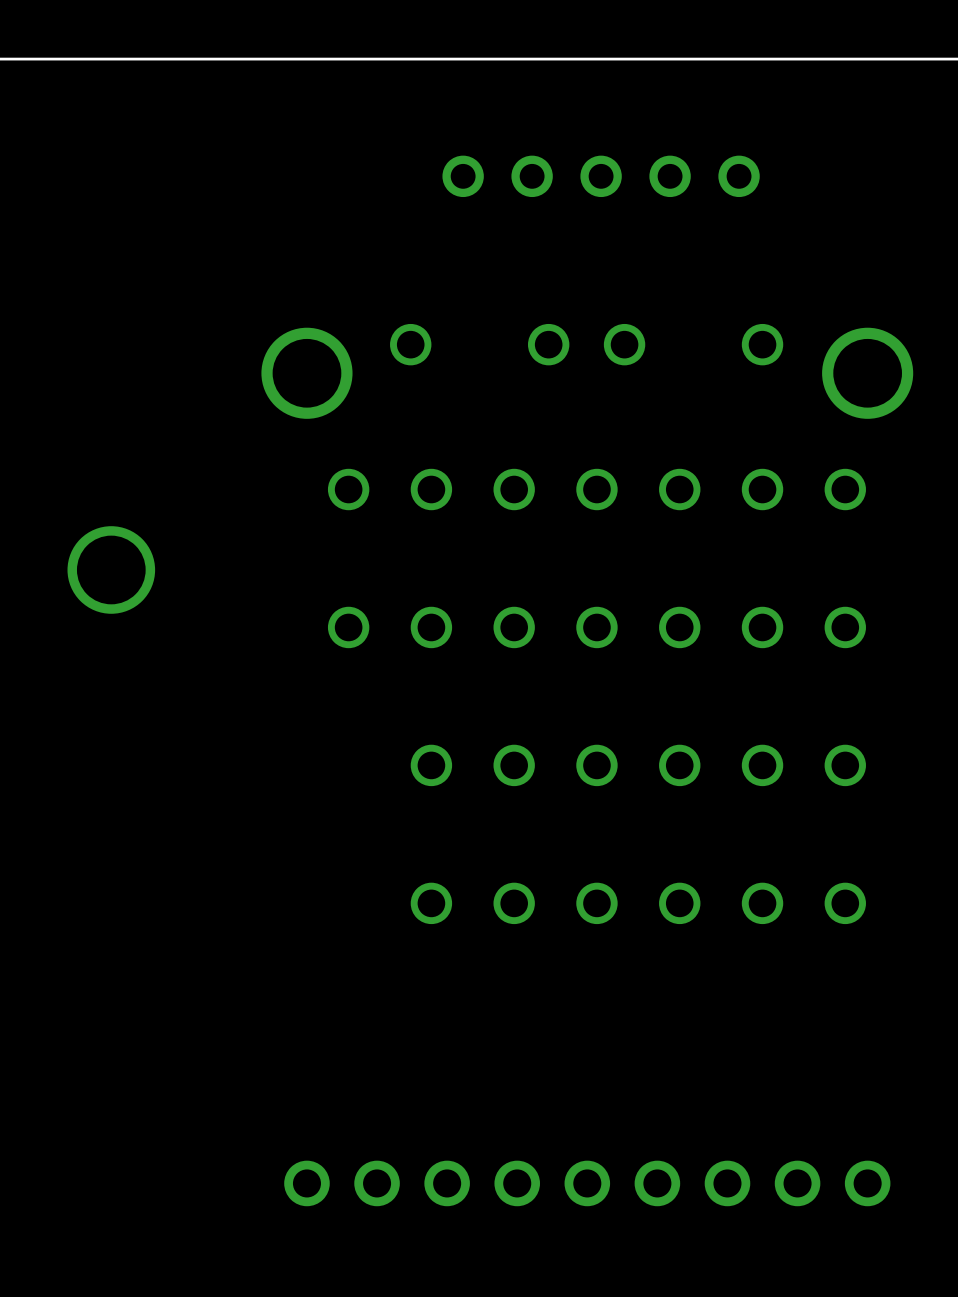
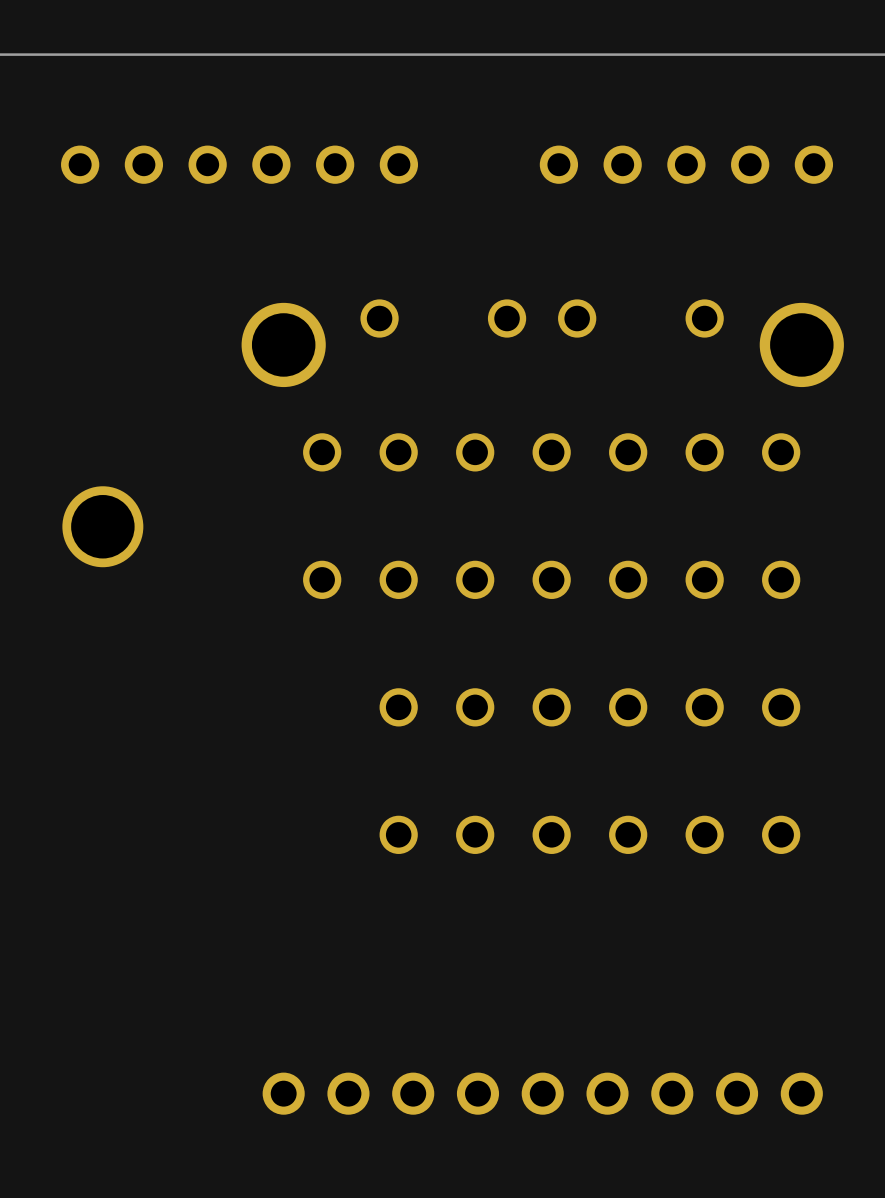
part position: (601, 176) -> (686, 164)
part: none -> (239, 164)

